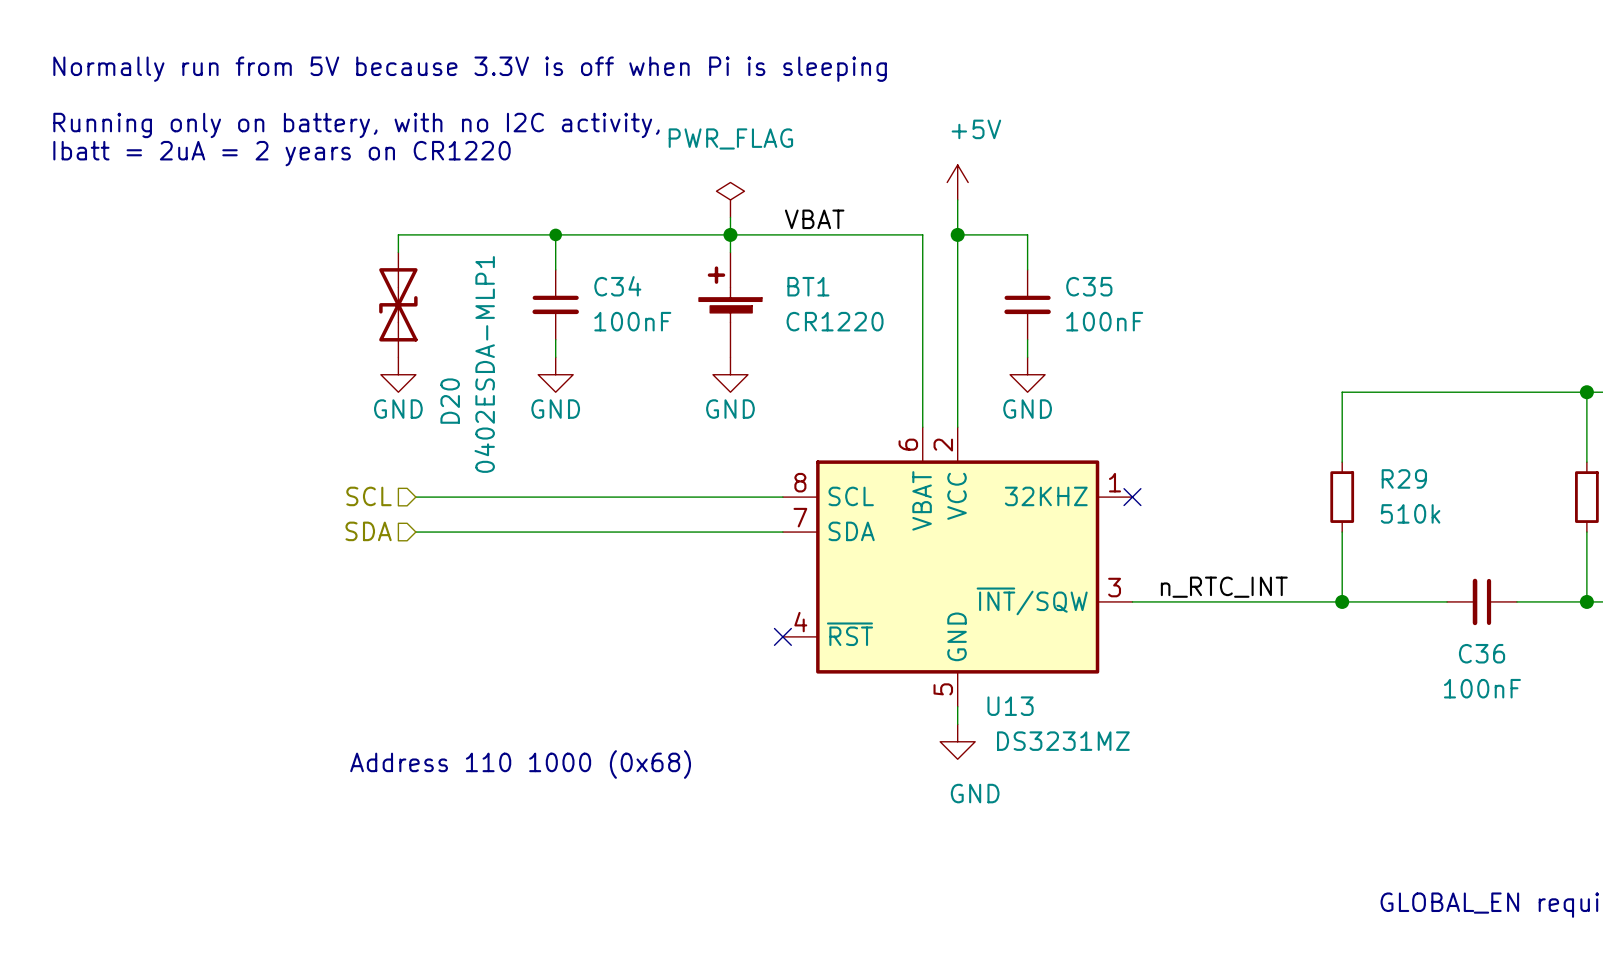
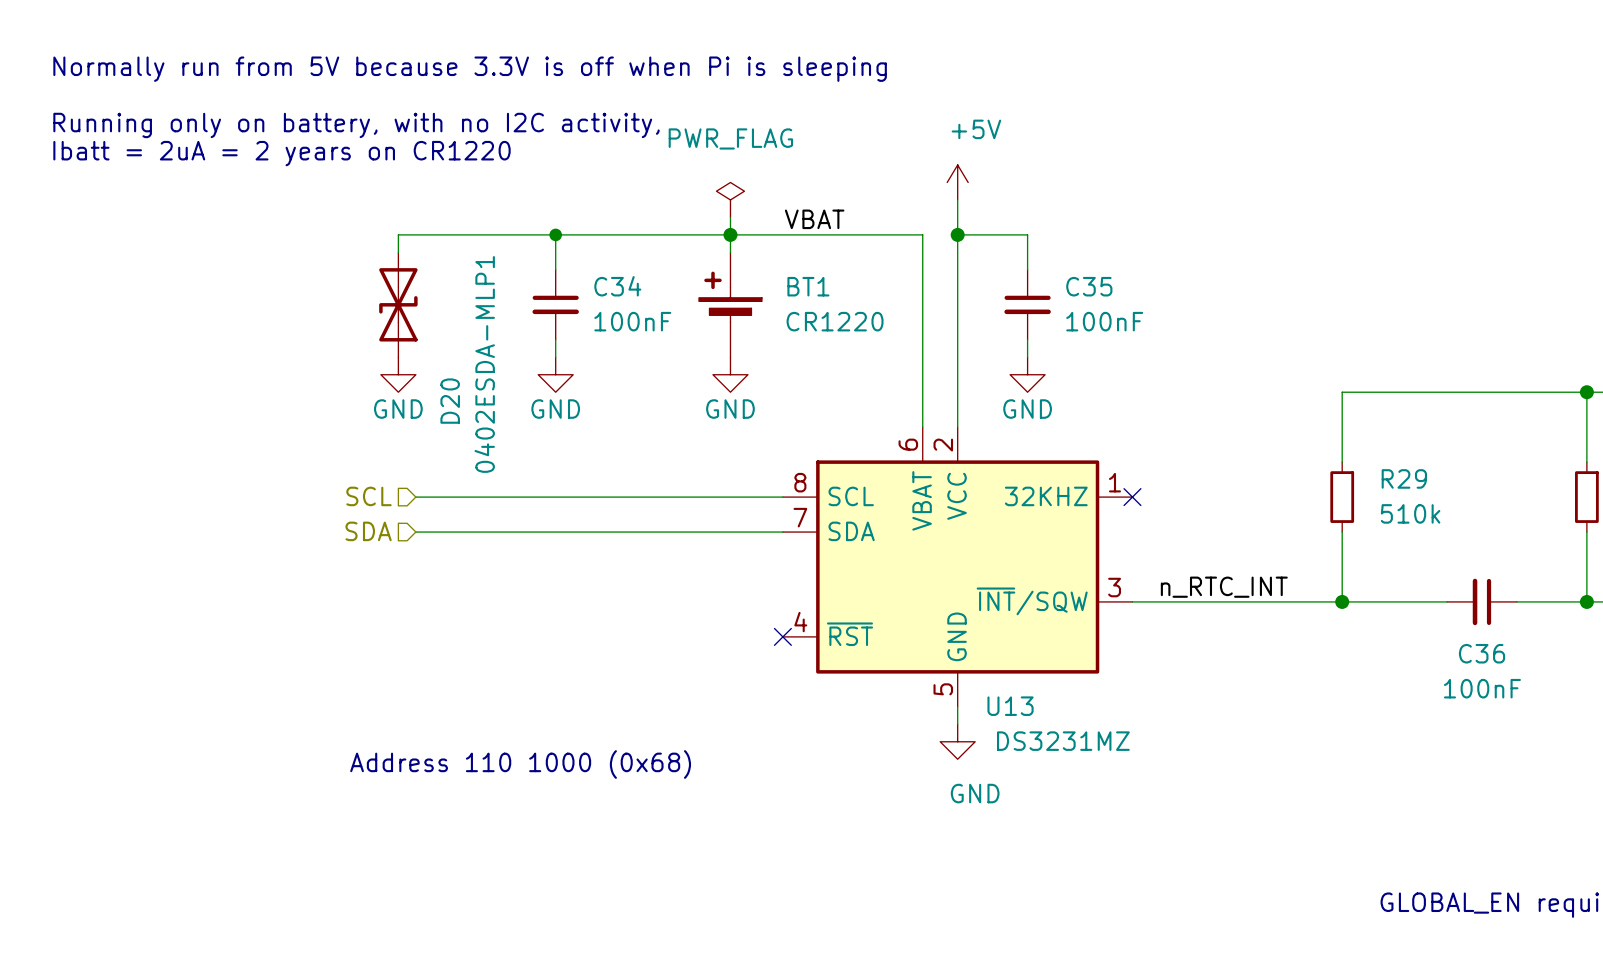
BT1 symbol: [699, 252, 762, 358] -> [699, 252, 762, 358]

